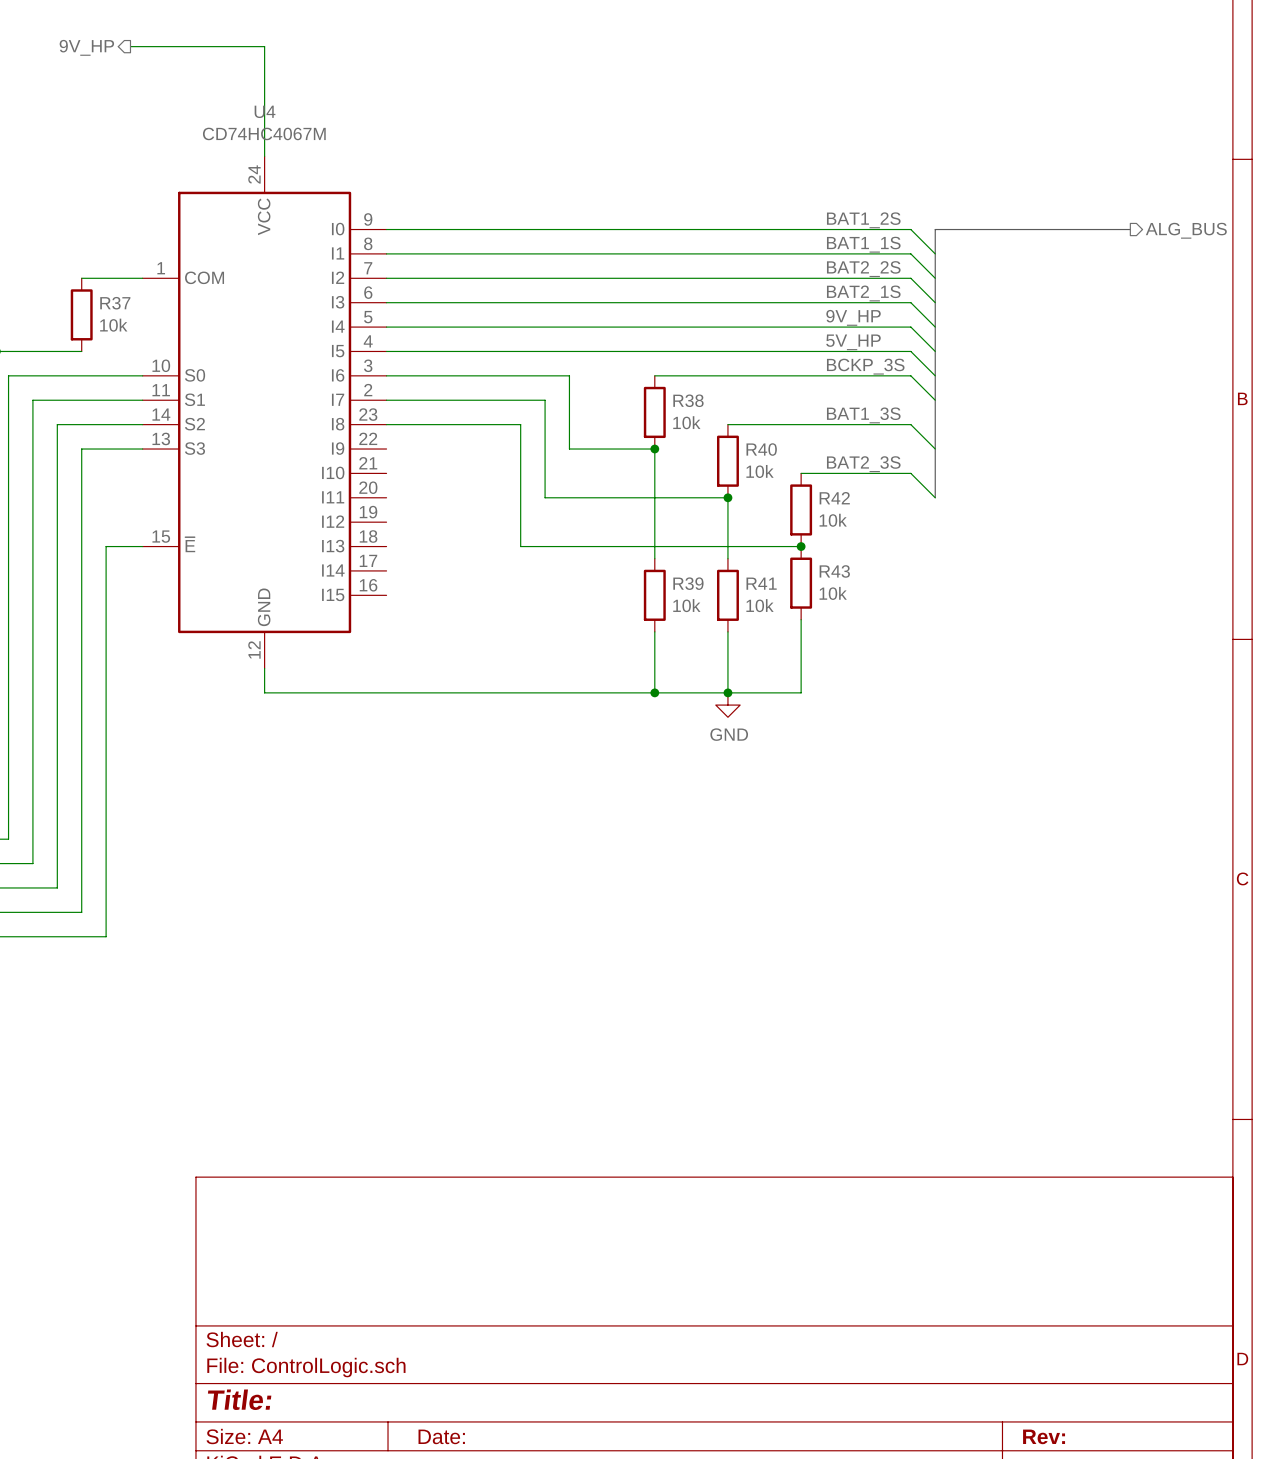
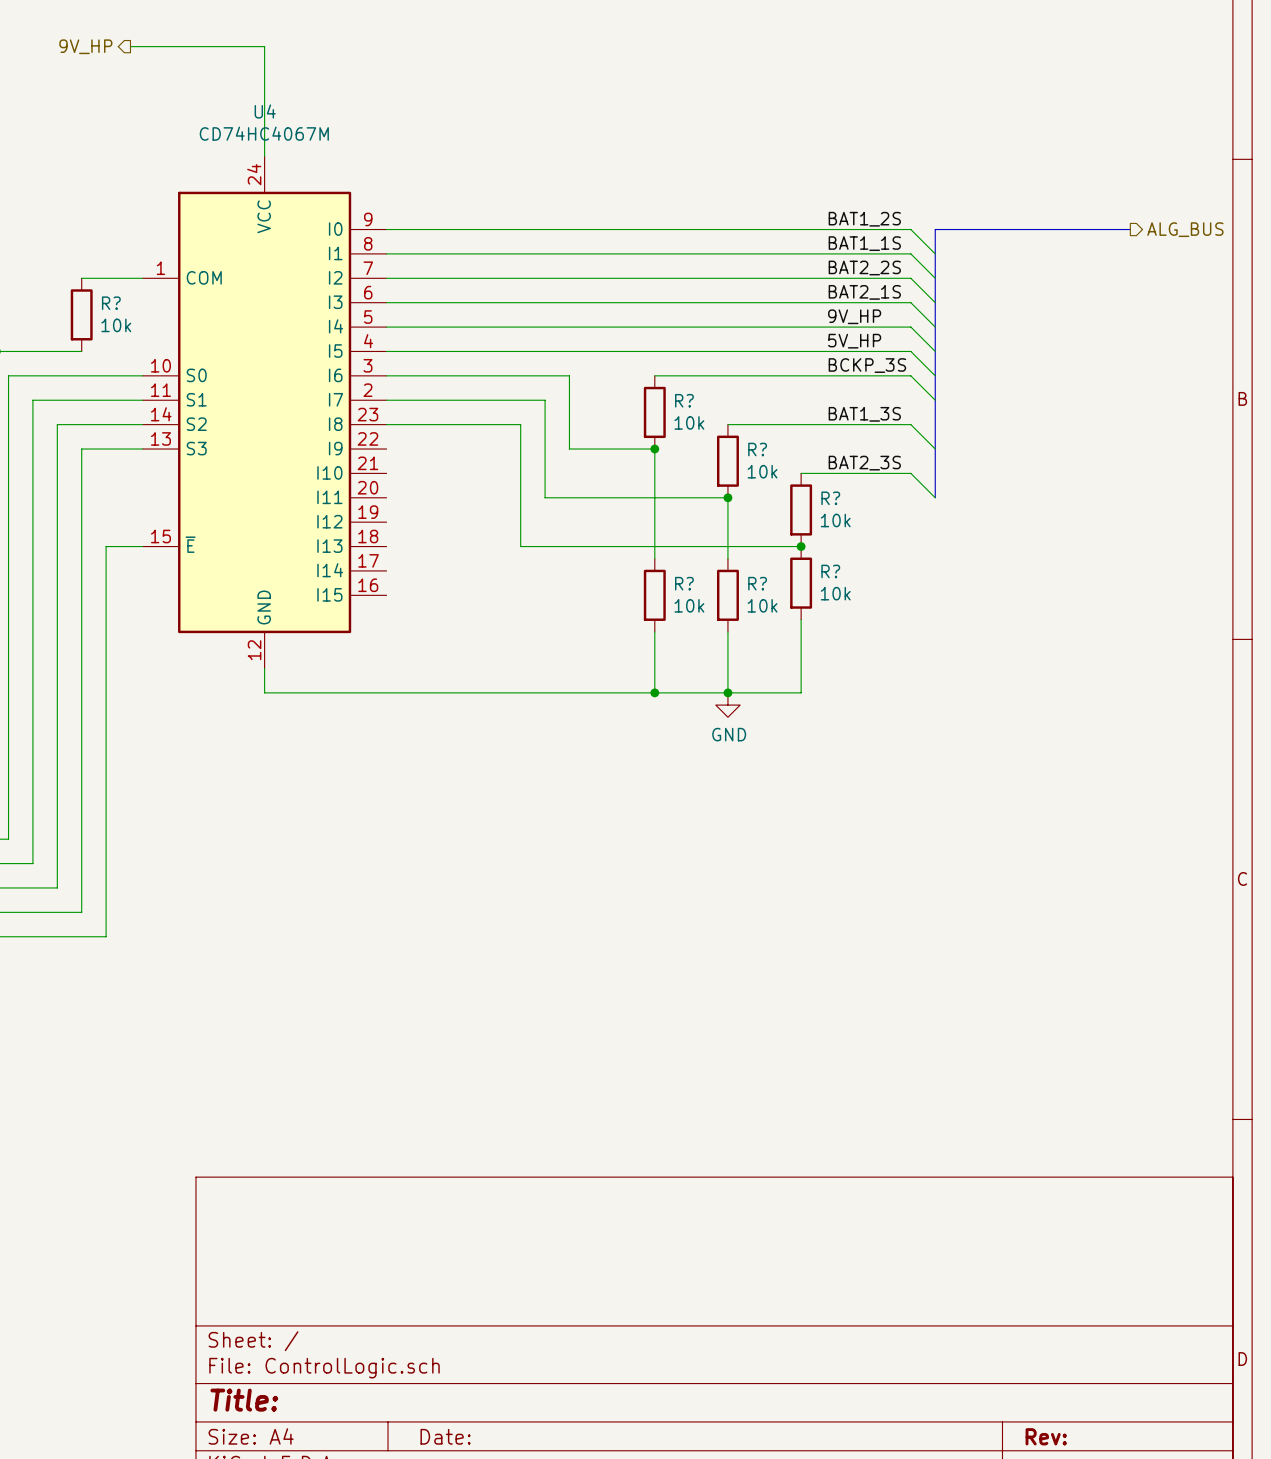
R37 name: R37 (115, 303) -> R? (111, 303)
R38 name: R38 (688, 400) -> R? (684, 400)
R40 name: R40 (761, 449) -> R? (757, 449)
R42 name: R42 (834, 498) -> R? (830, 498)
R43 name: R43 (834, 571) -> R? (830, 571)
R39 name: R39 (688, 583) -> R? (684, 583)
R41 name: R41 (761, 583) -> R? (757, 583)

